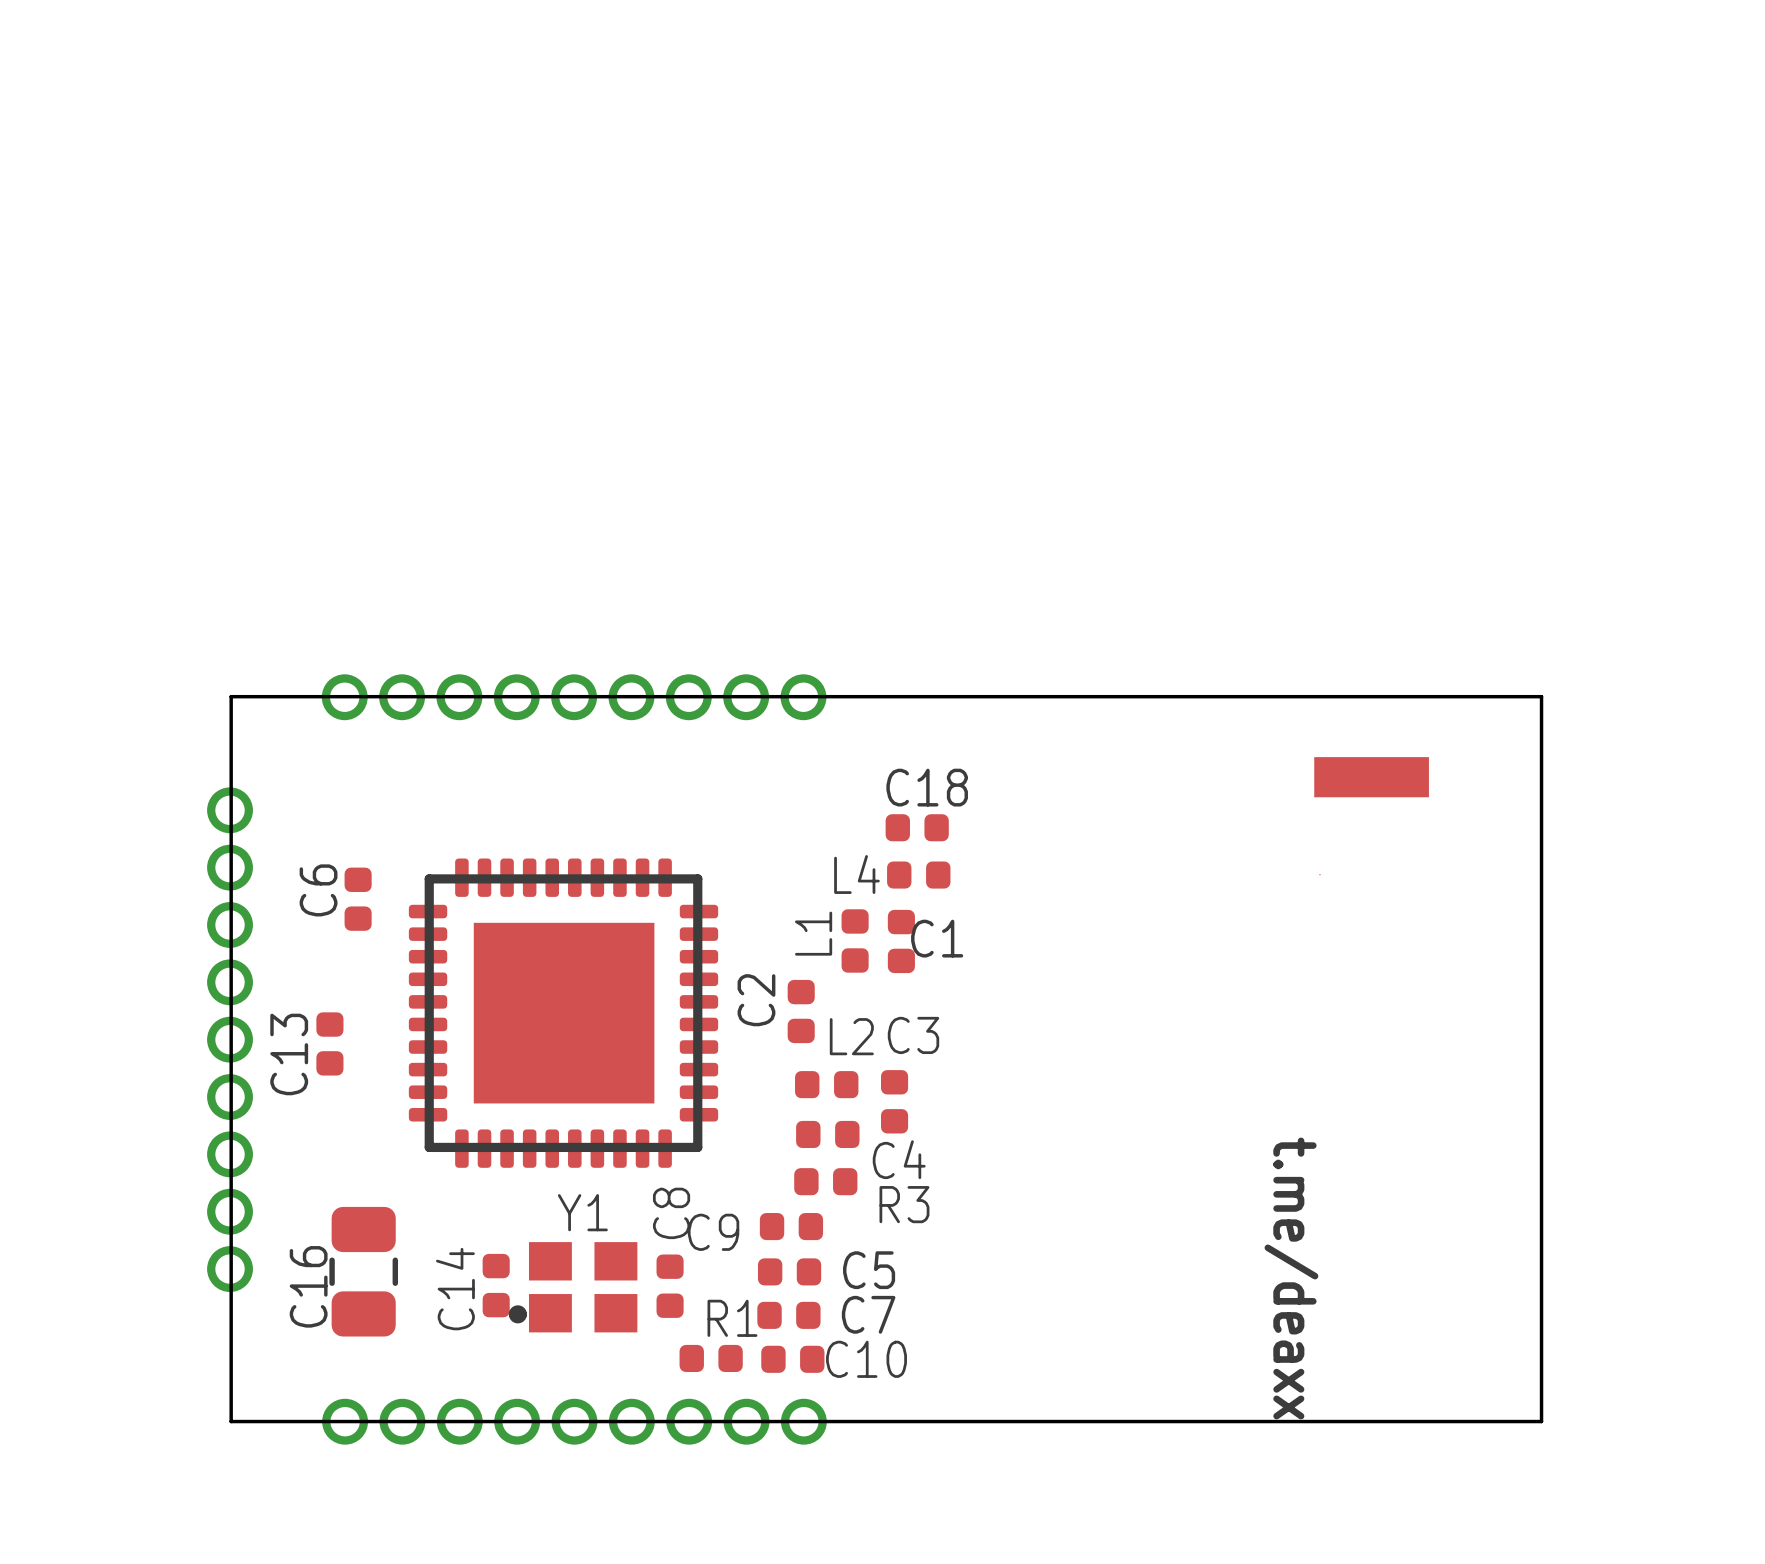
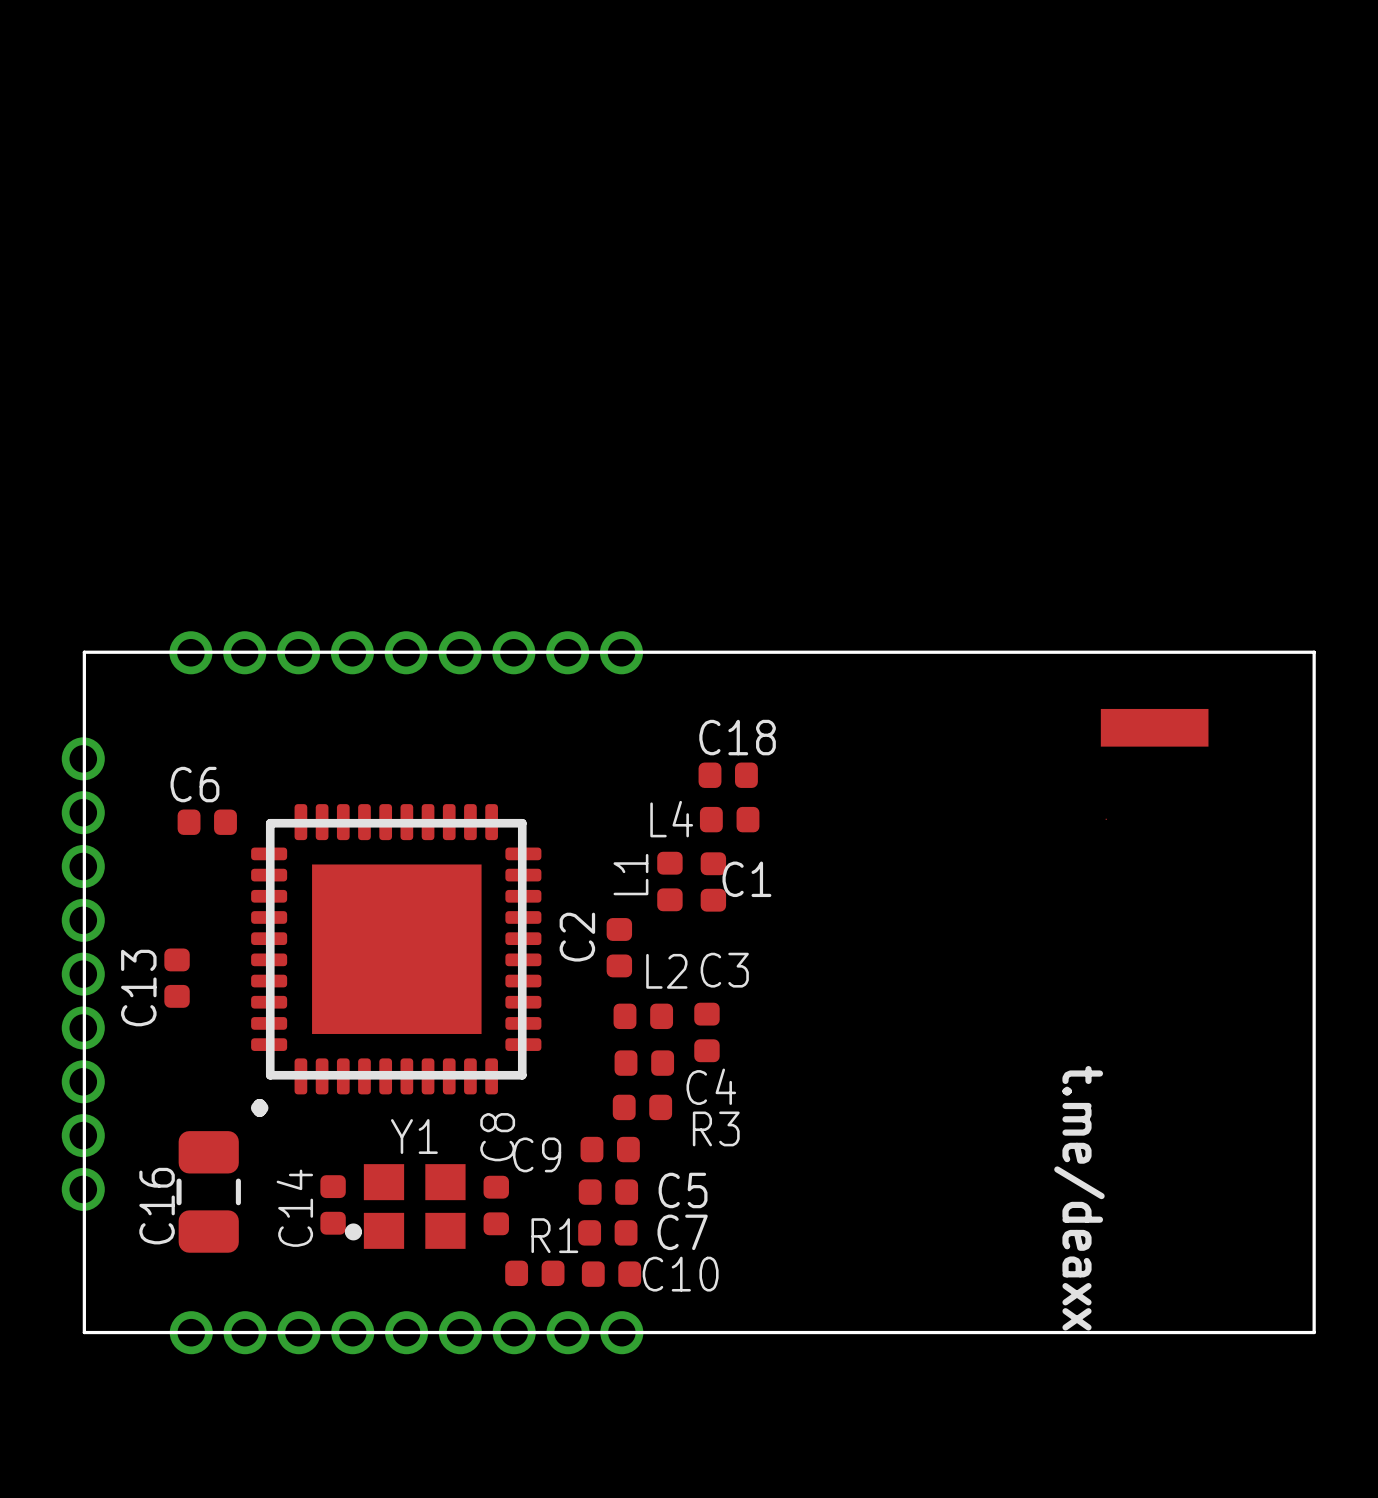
C6 rotation: 0° (358, 899) -> 90° clockwise (207, 822)
text: none -> . (259, 1107)

